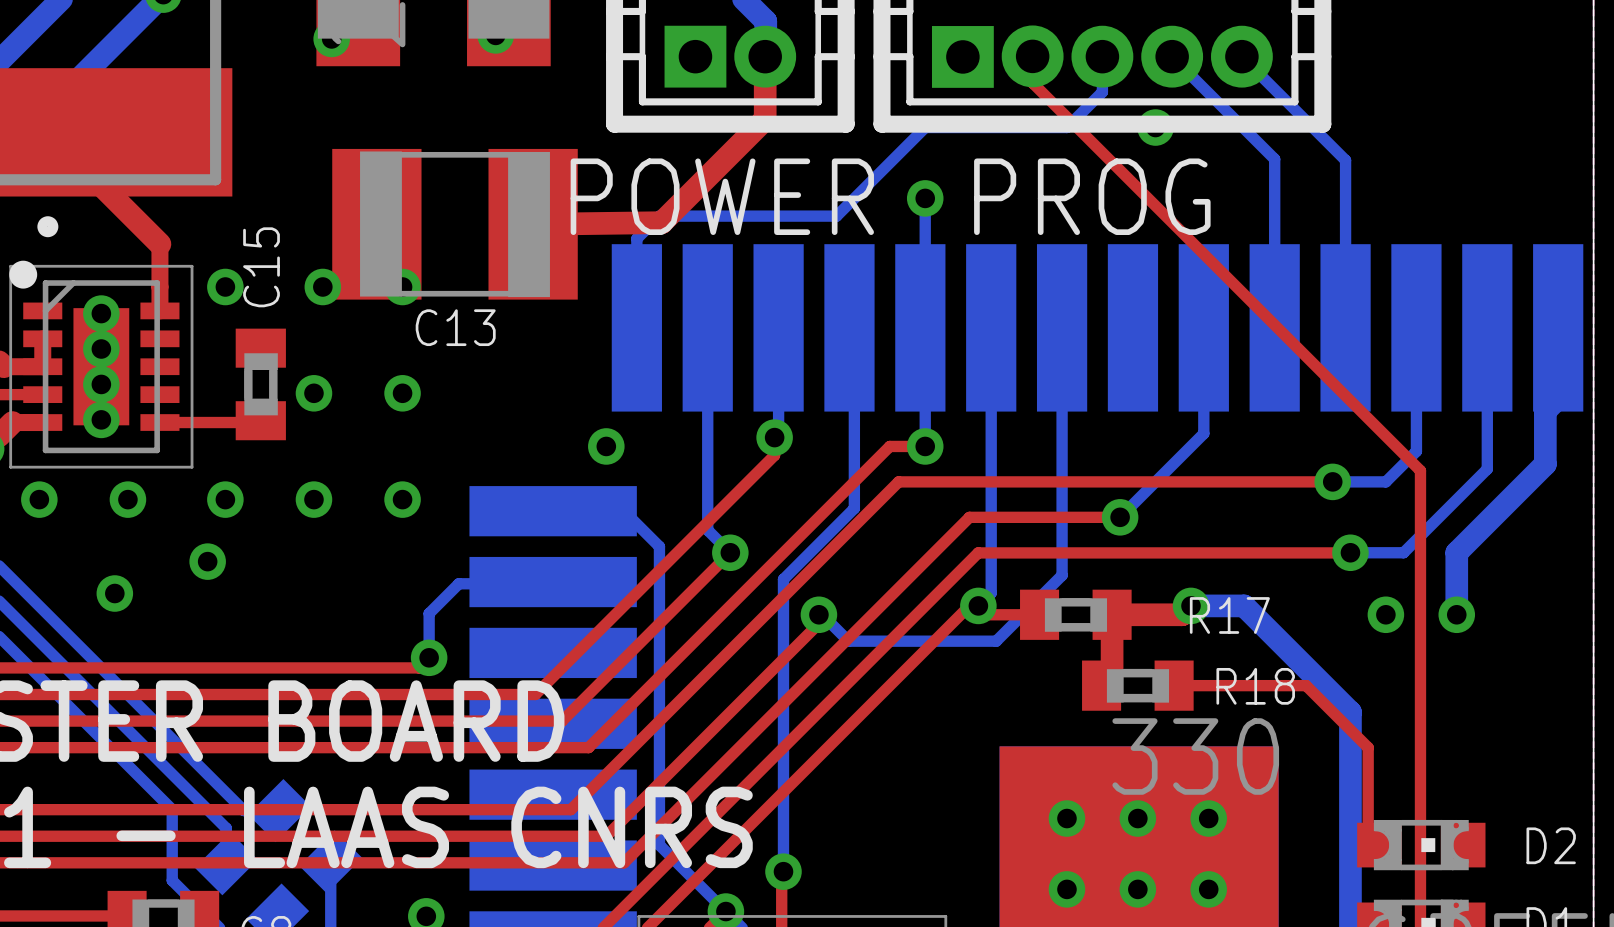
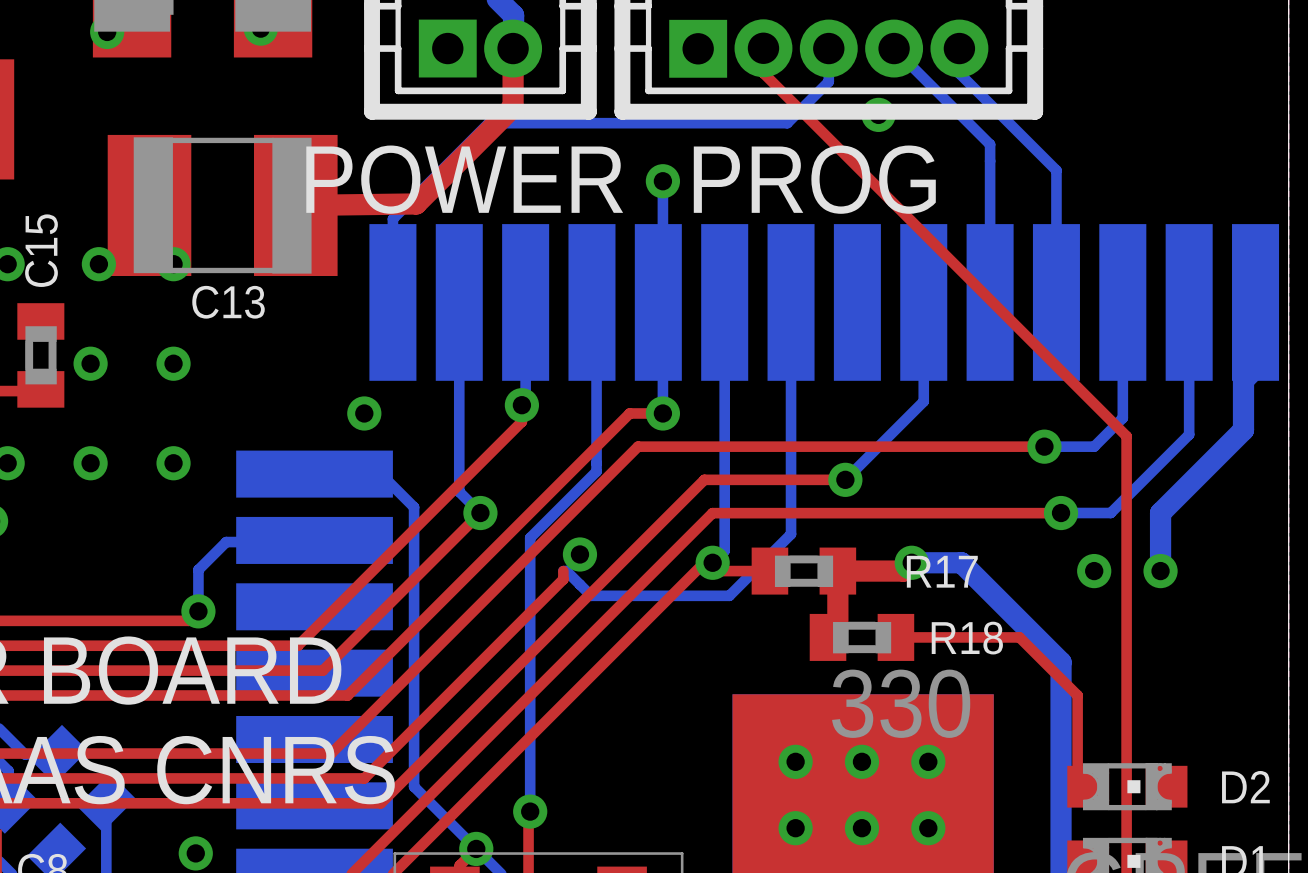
bottom track: (1241, 56) (1345, 160) (1345, 186) -> (959, 48) (959, 73) (1056, 170)
bottom track: (1066, 127) (925, 127) (836, 216) (659, 216) -> (795, 114) (787, 123) (488, 123) (414, 197)
via position: (818, 614) -> (579, 554)

